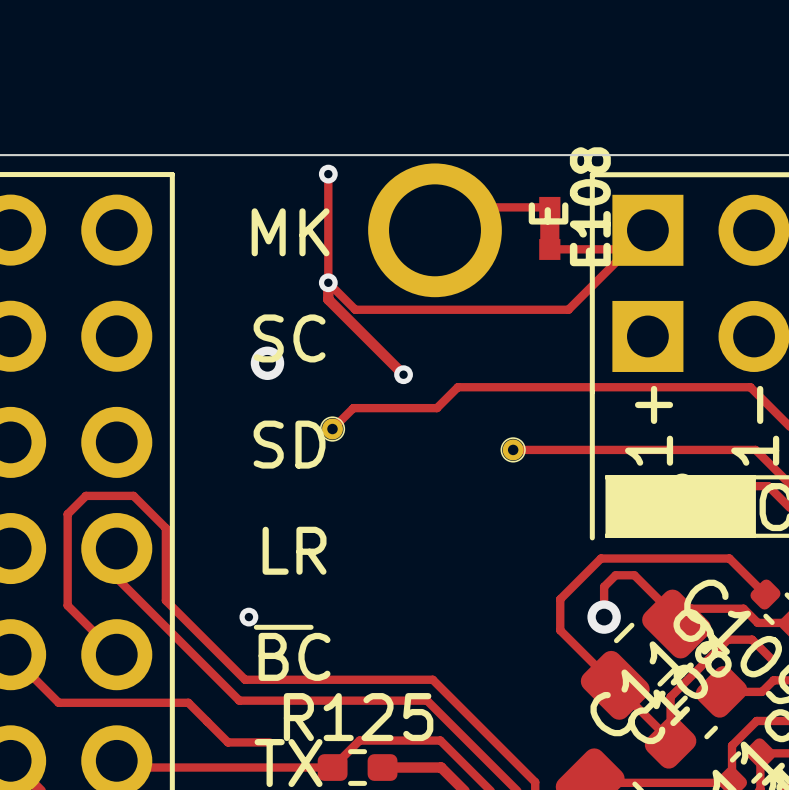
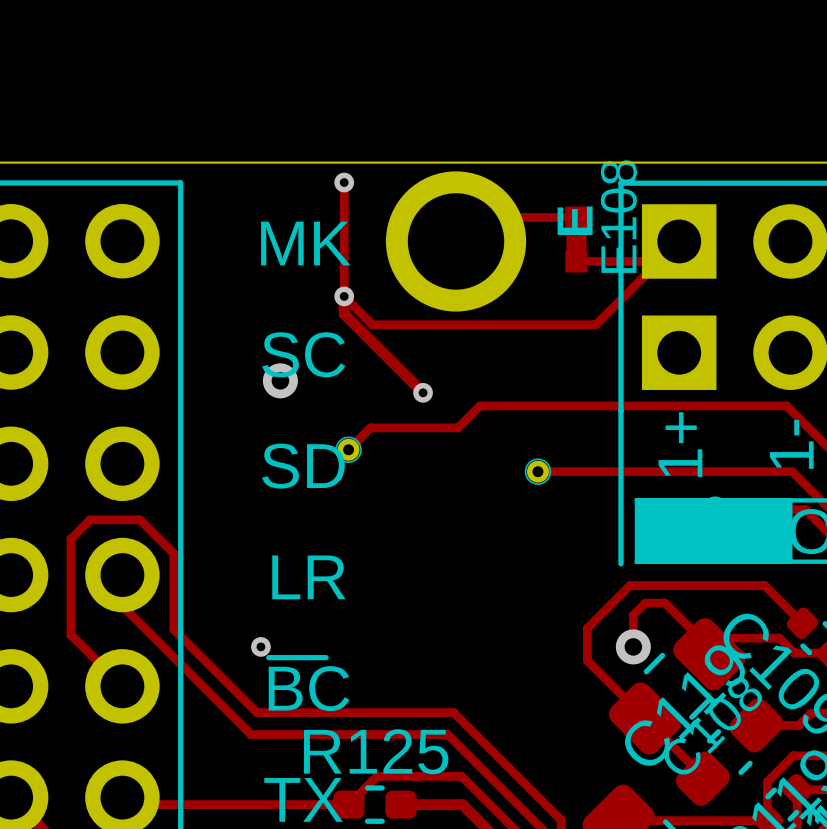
track: (10, 654) (58, 702) (188, 702) (228, 742) (269, 742) -> none
track: (771, 658) (752, 639) (727, 639) (670, 696) (670, 740) -> none

